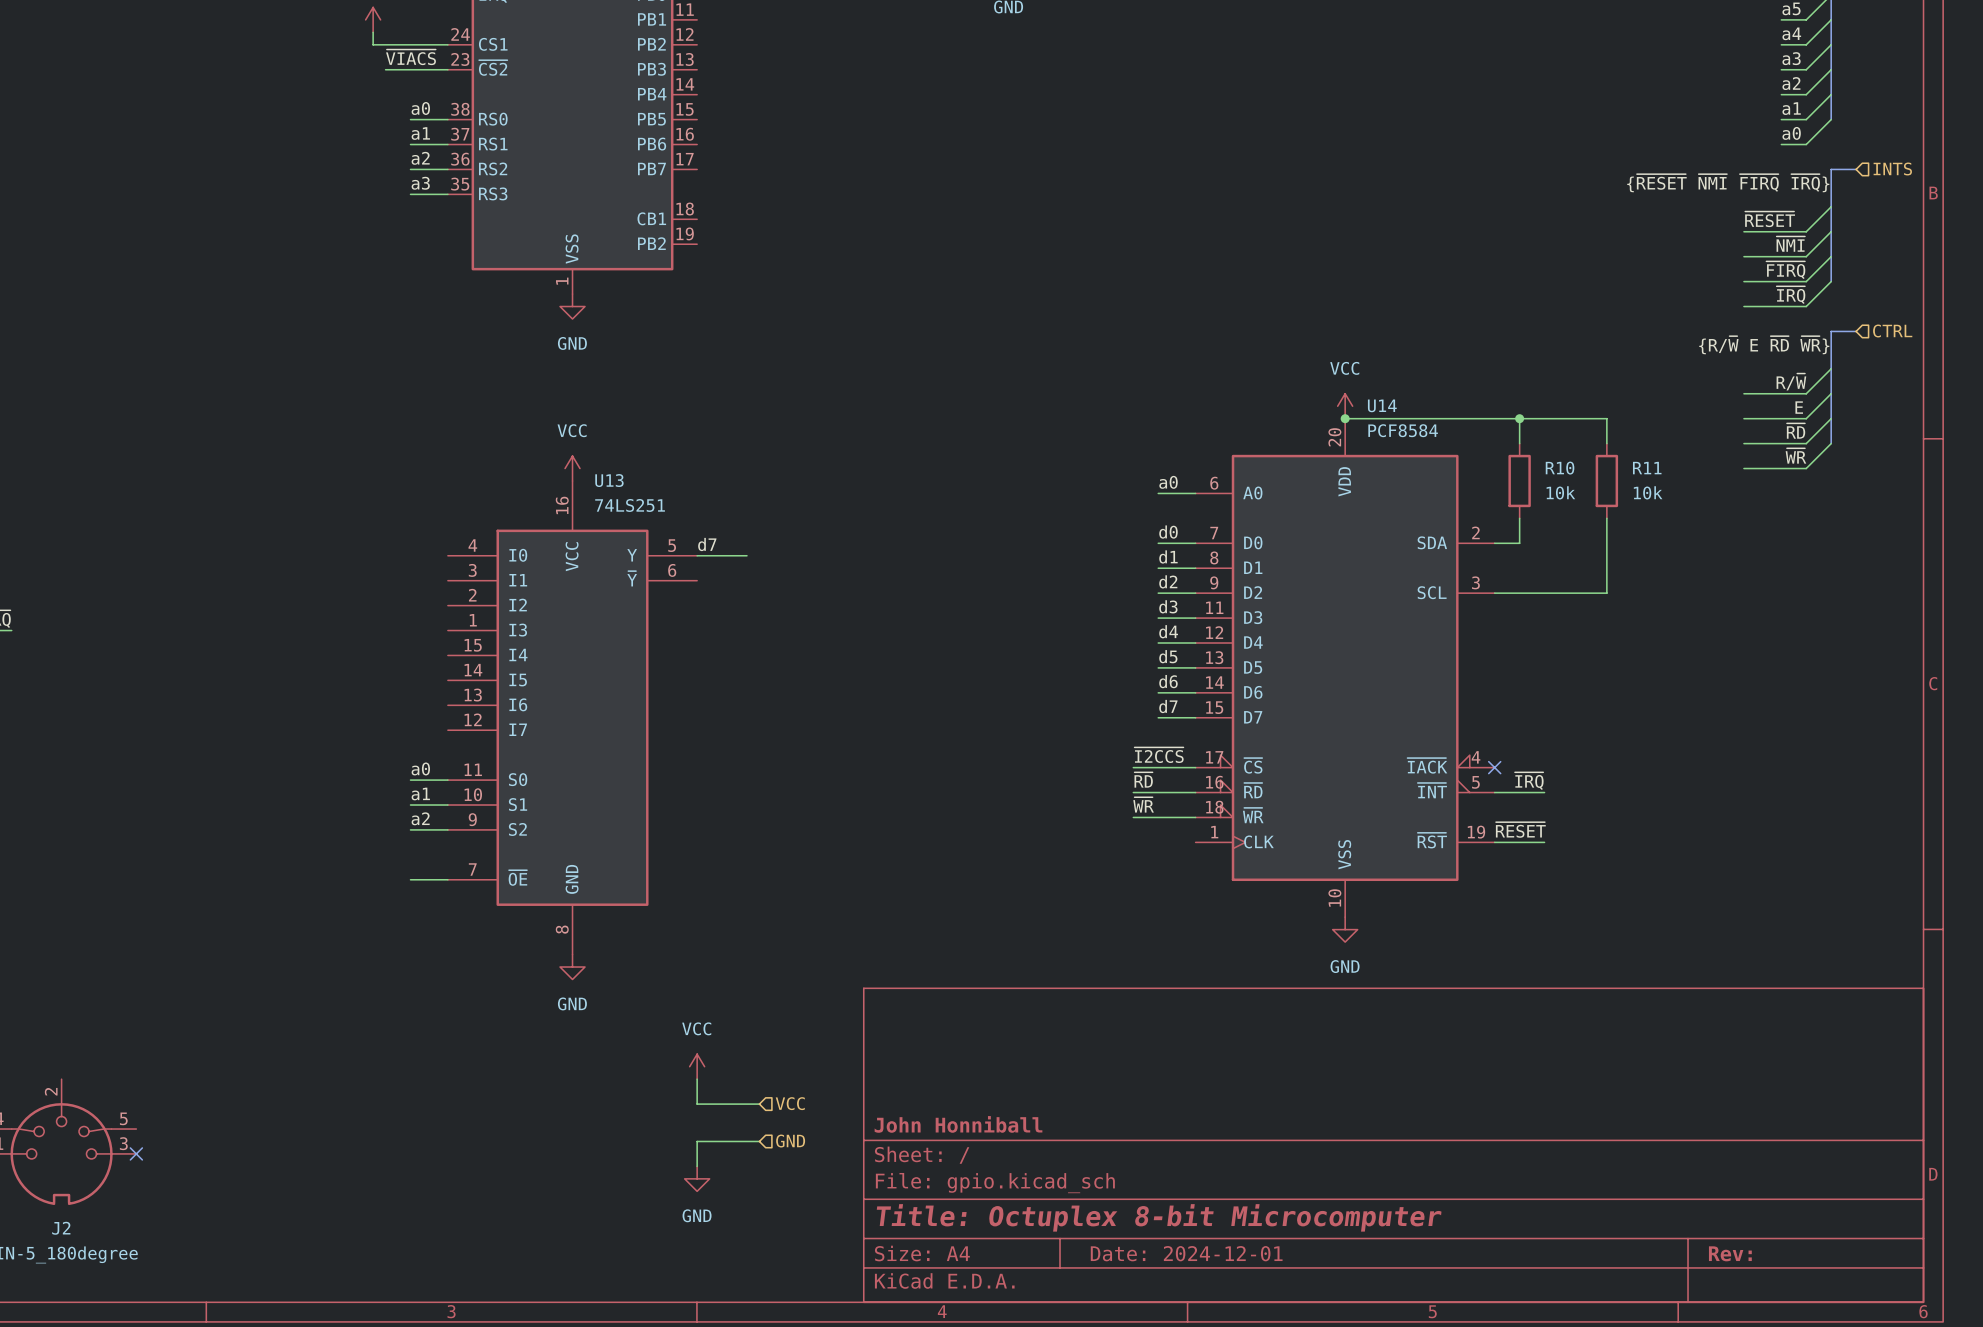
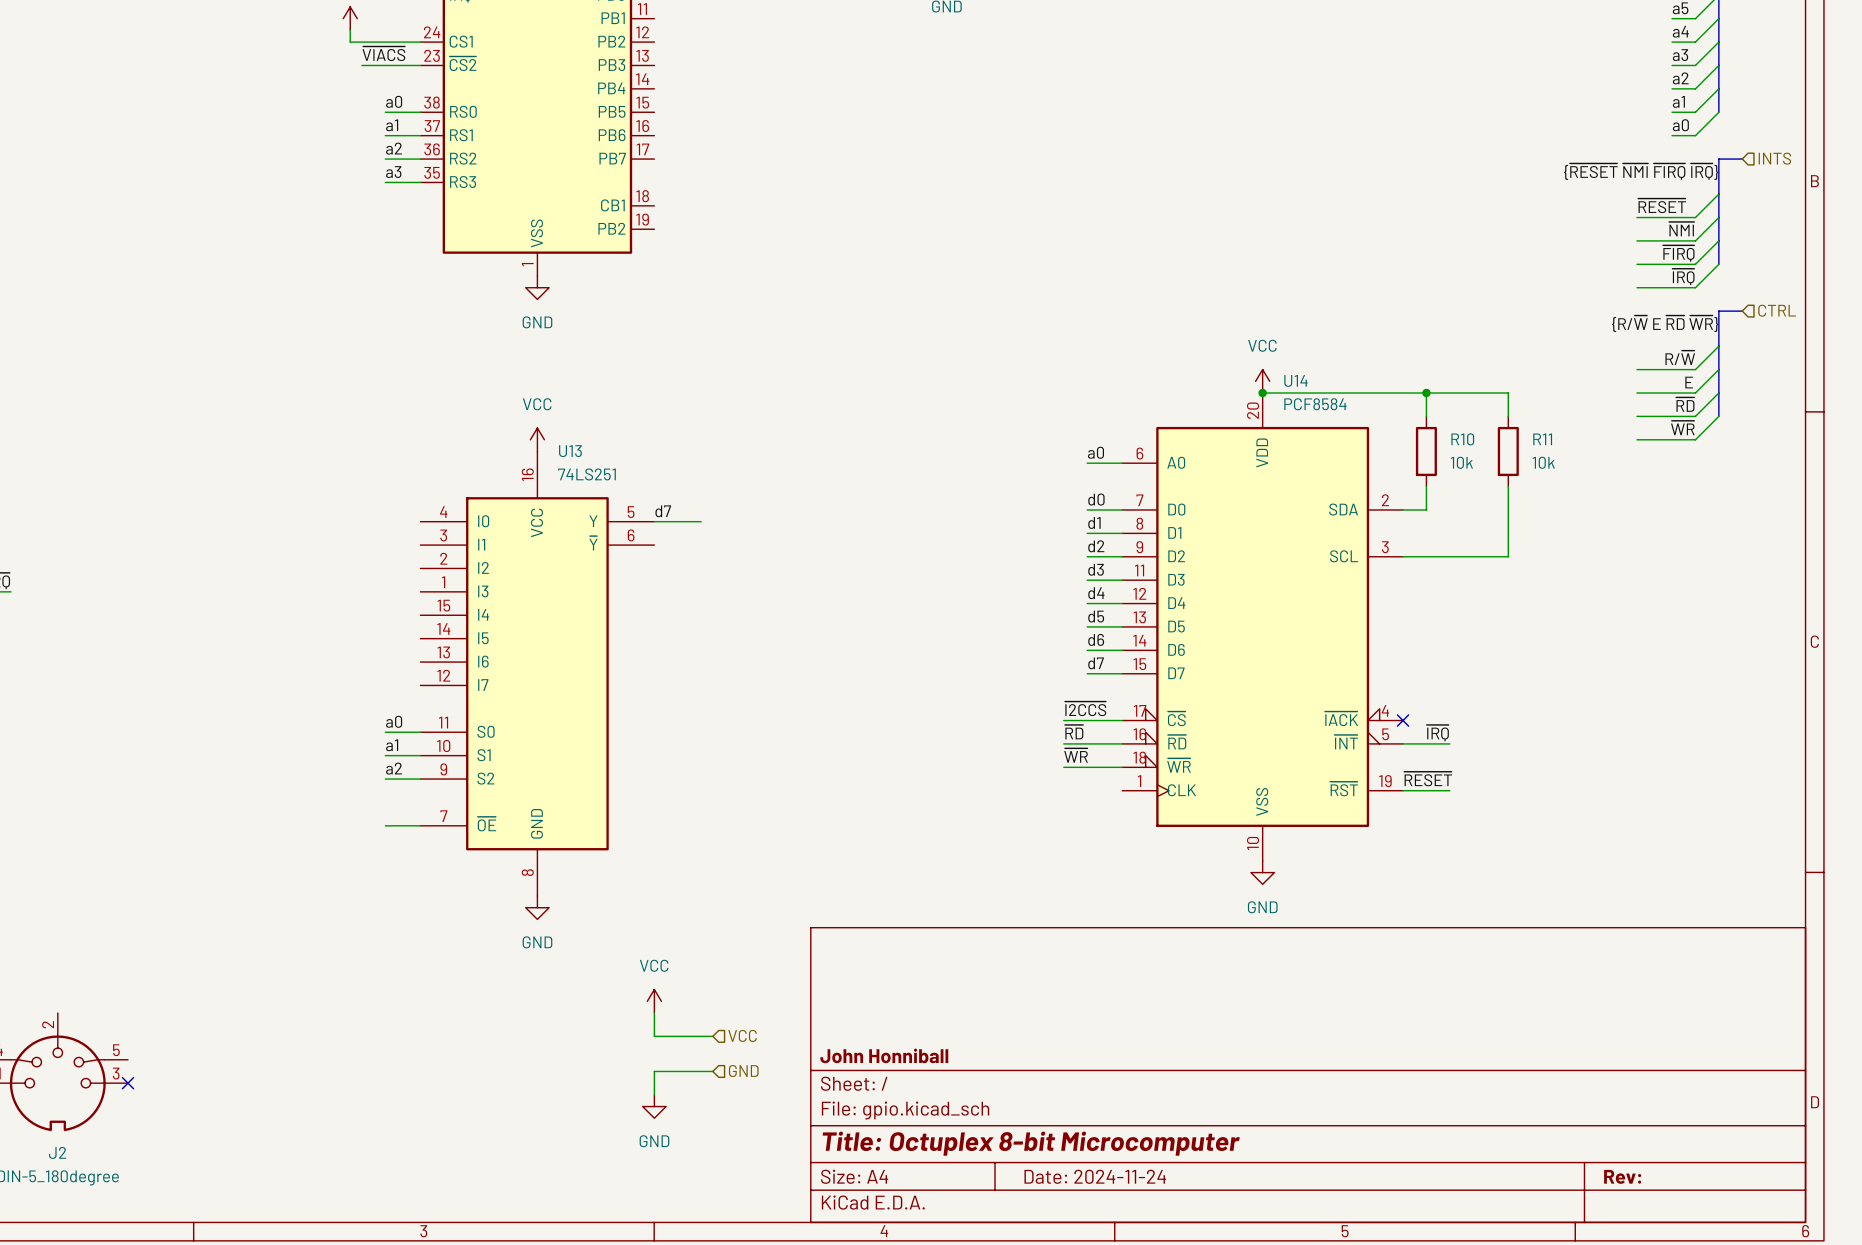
title block: Date: 2024-12-01 (1186, 1253) -> Date: 2024-11-24 (1095, 1176)

